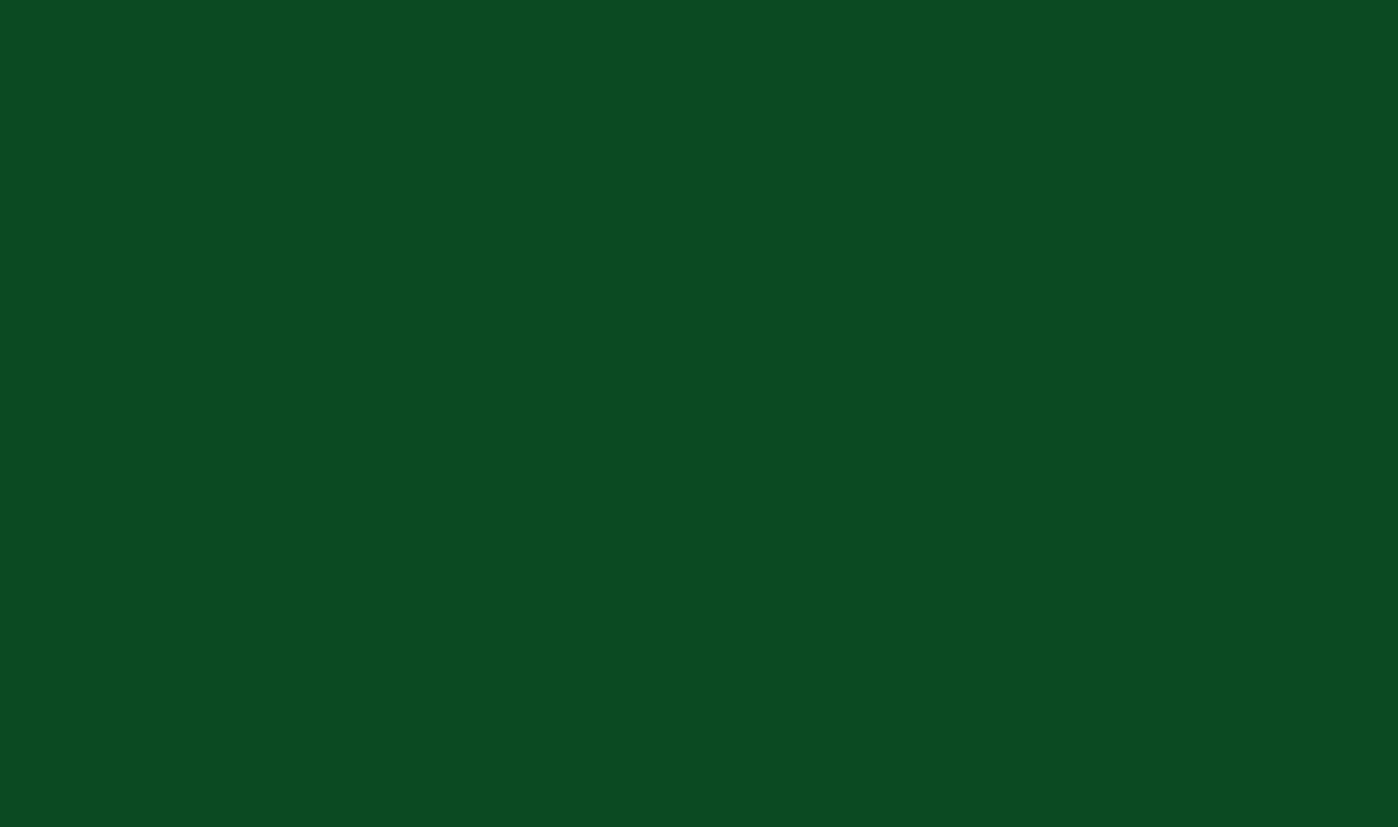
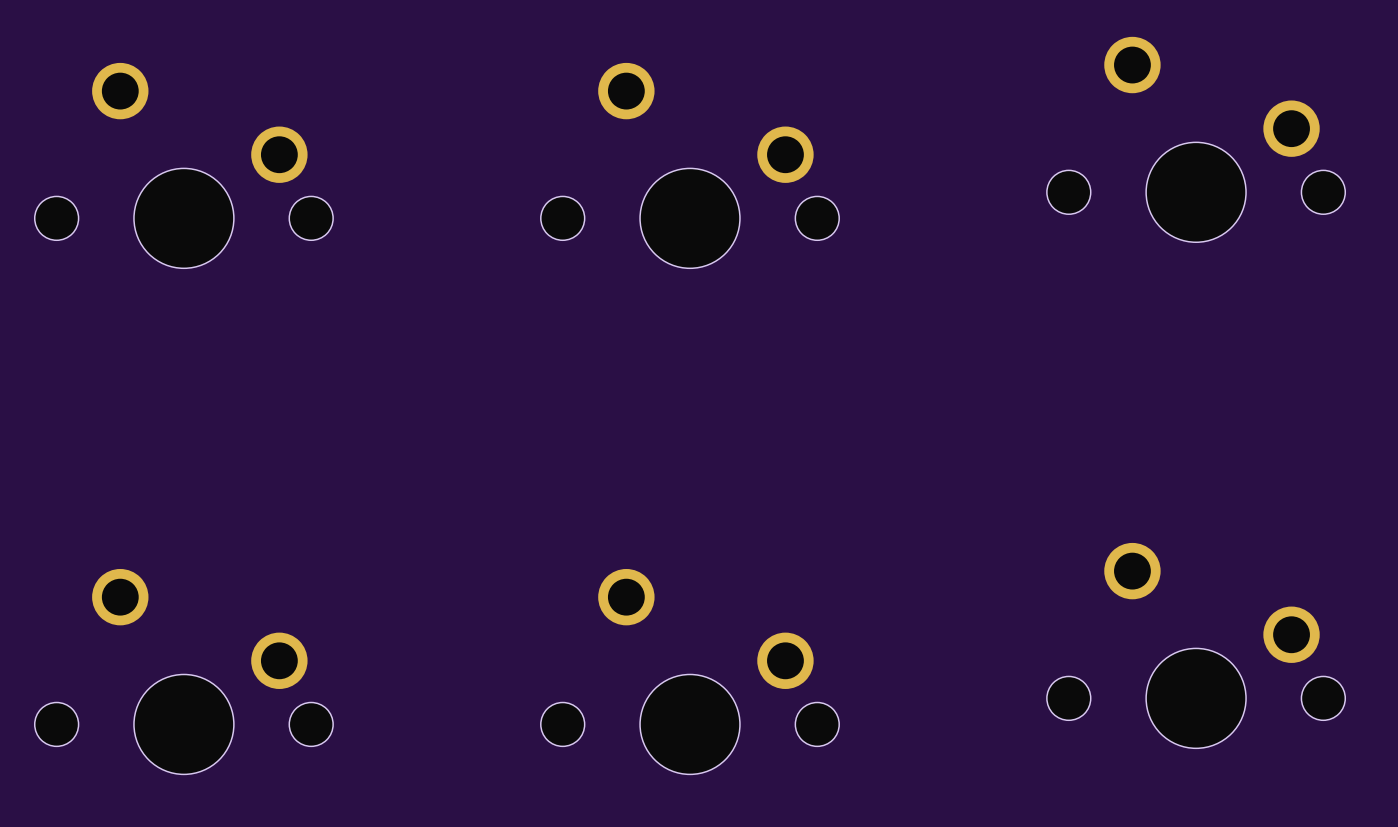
part: none -> (1196, 139)
part: none -> (183, 165)
part: none -> (690, 165)
part: none -> (1196, 645)
part: none -> (183, 671)
part: none -> (690, 671)

